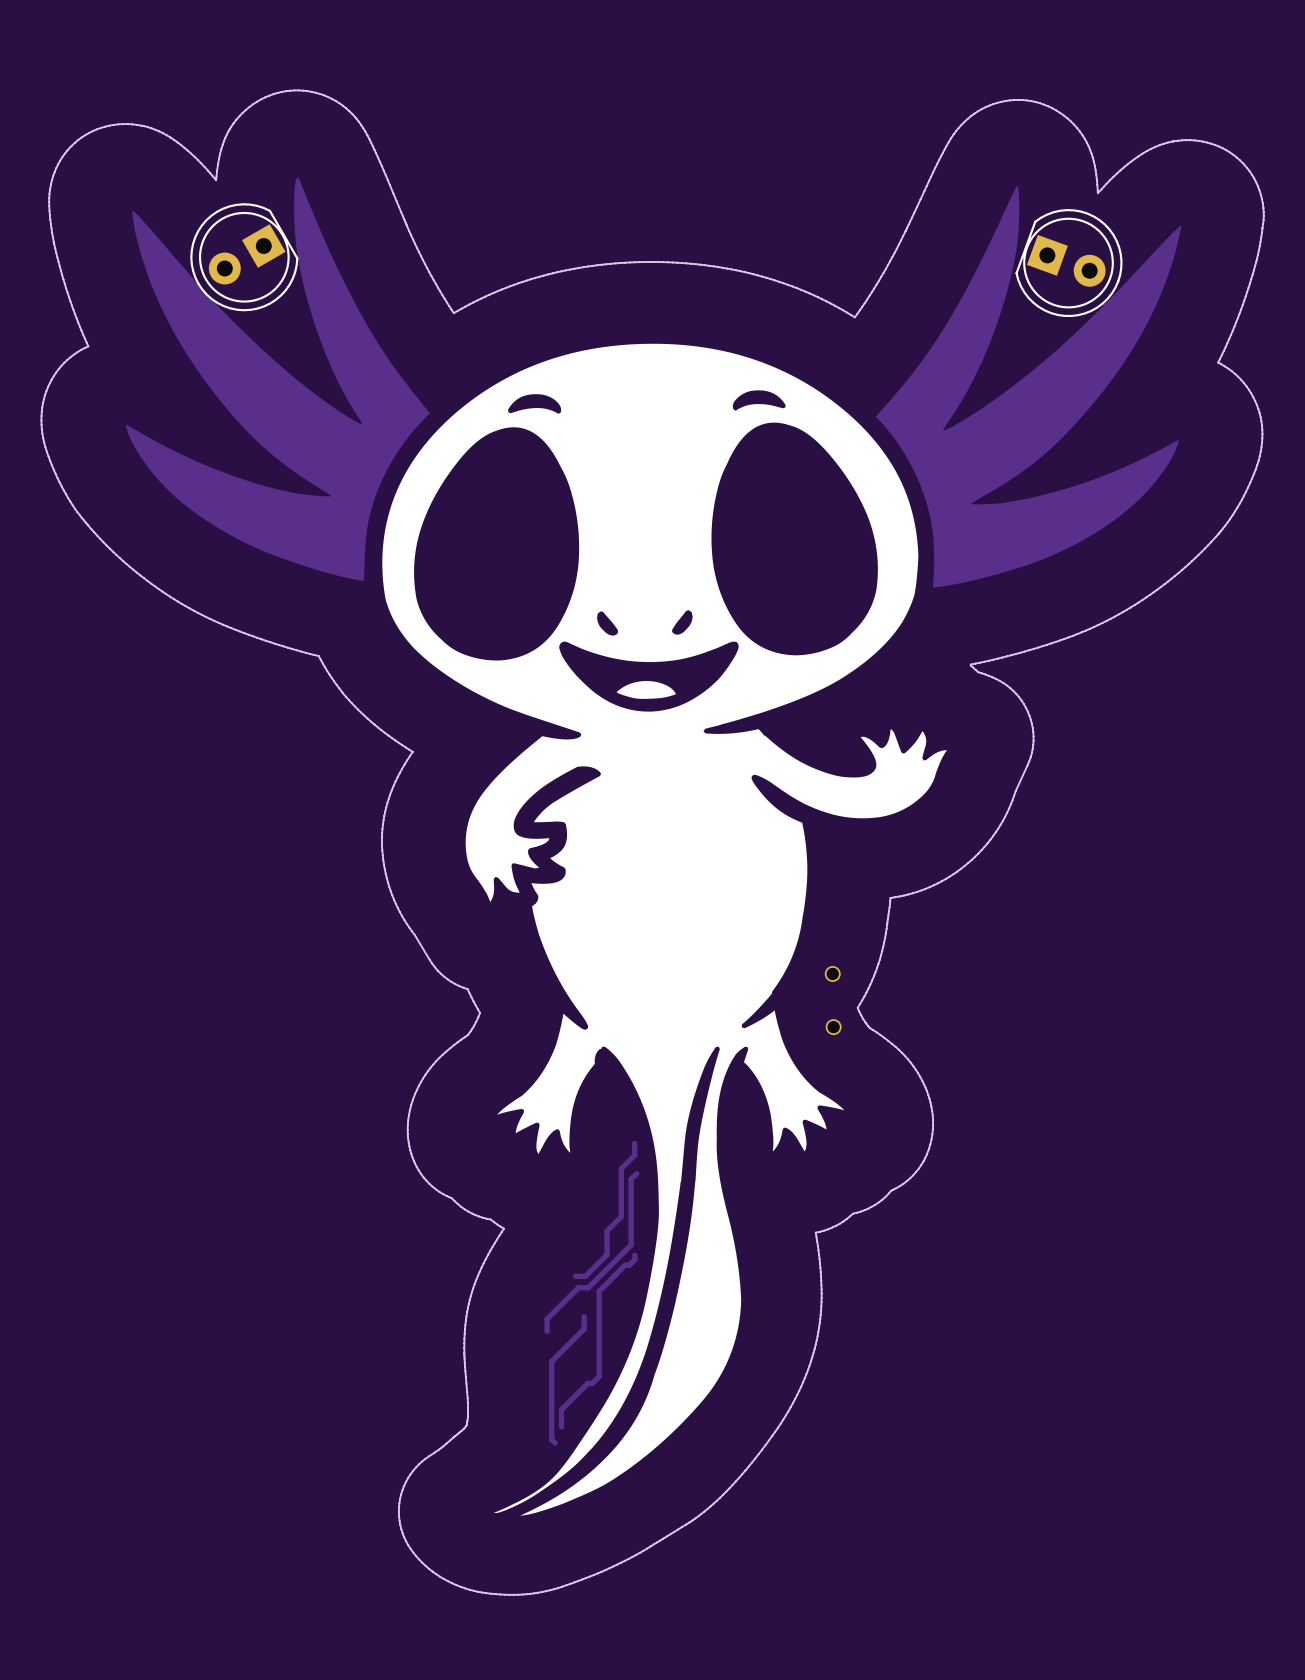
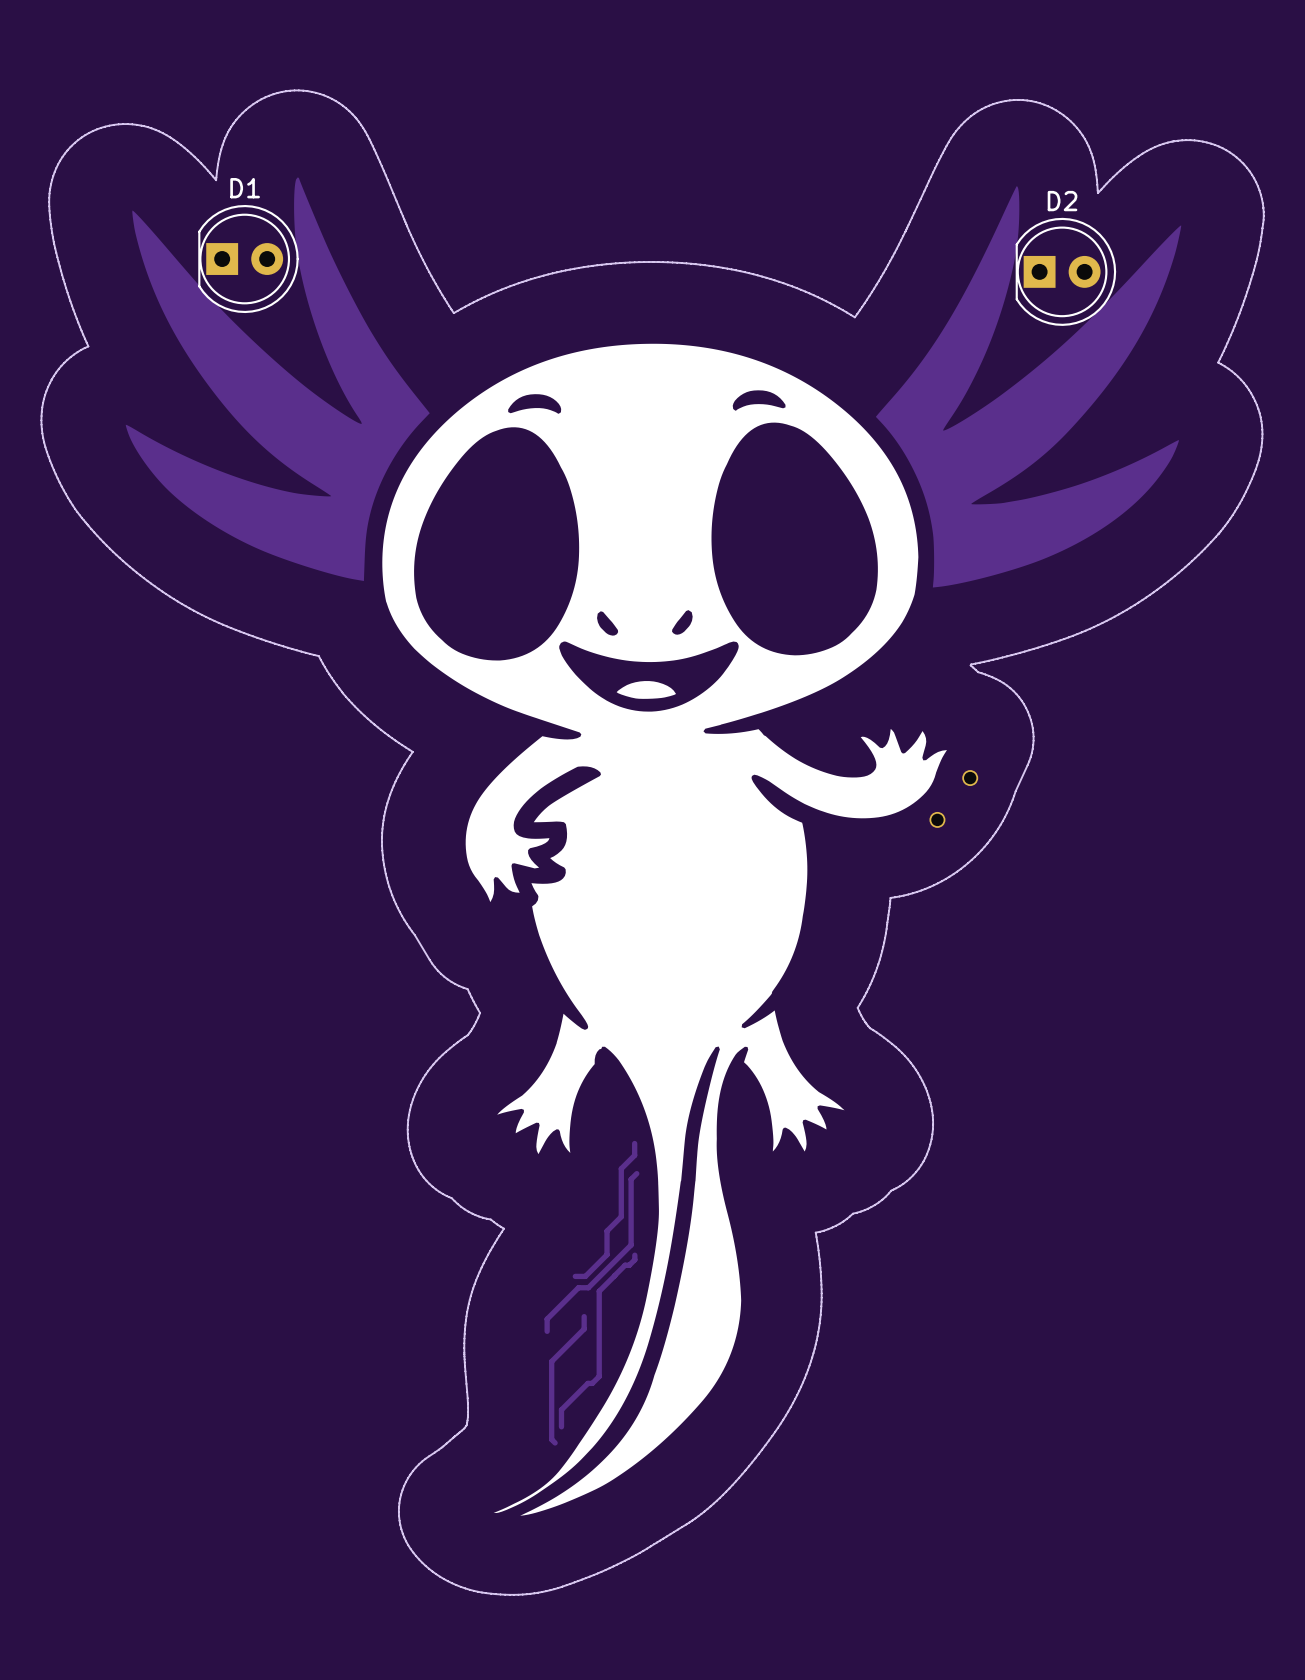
part: (244, 257) -> none
D1: none -> (248, 259)
part: (1069, 263) -> none
D2: none -> (1065, 271)
part: none -> (953, 798)
part: (833, 1000) -> none

